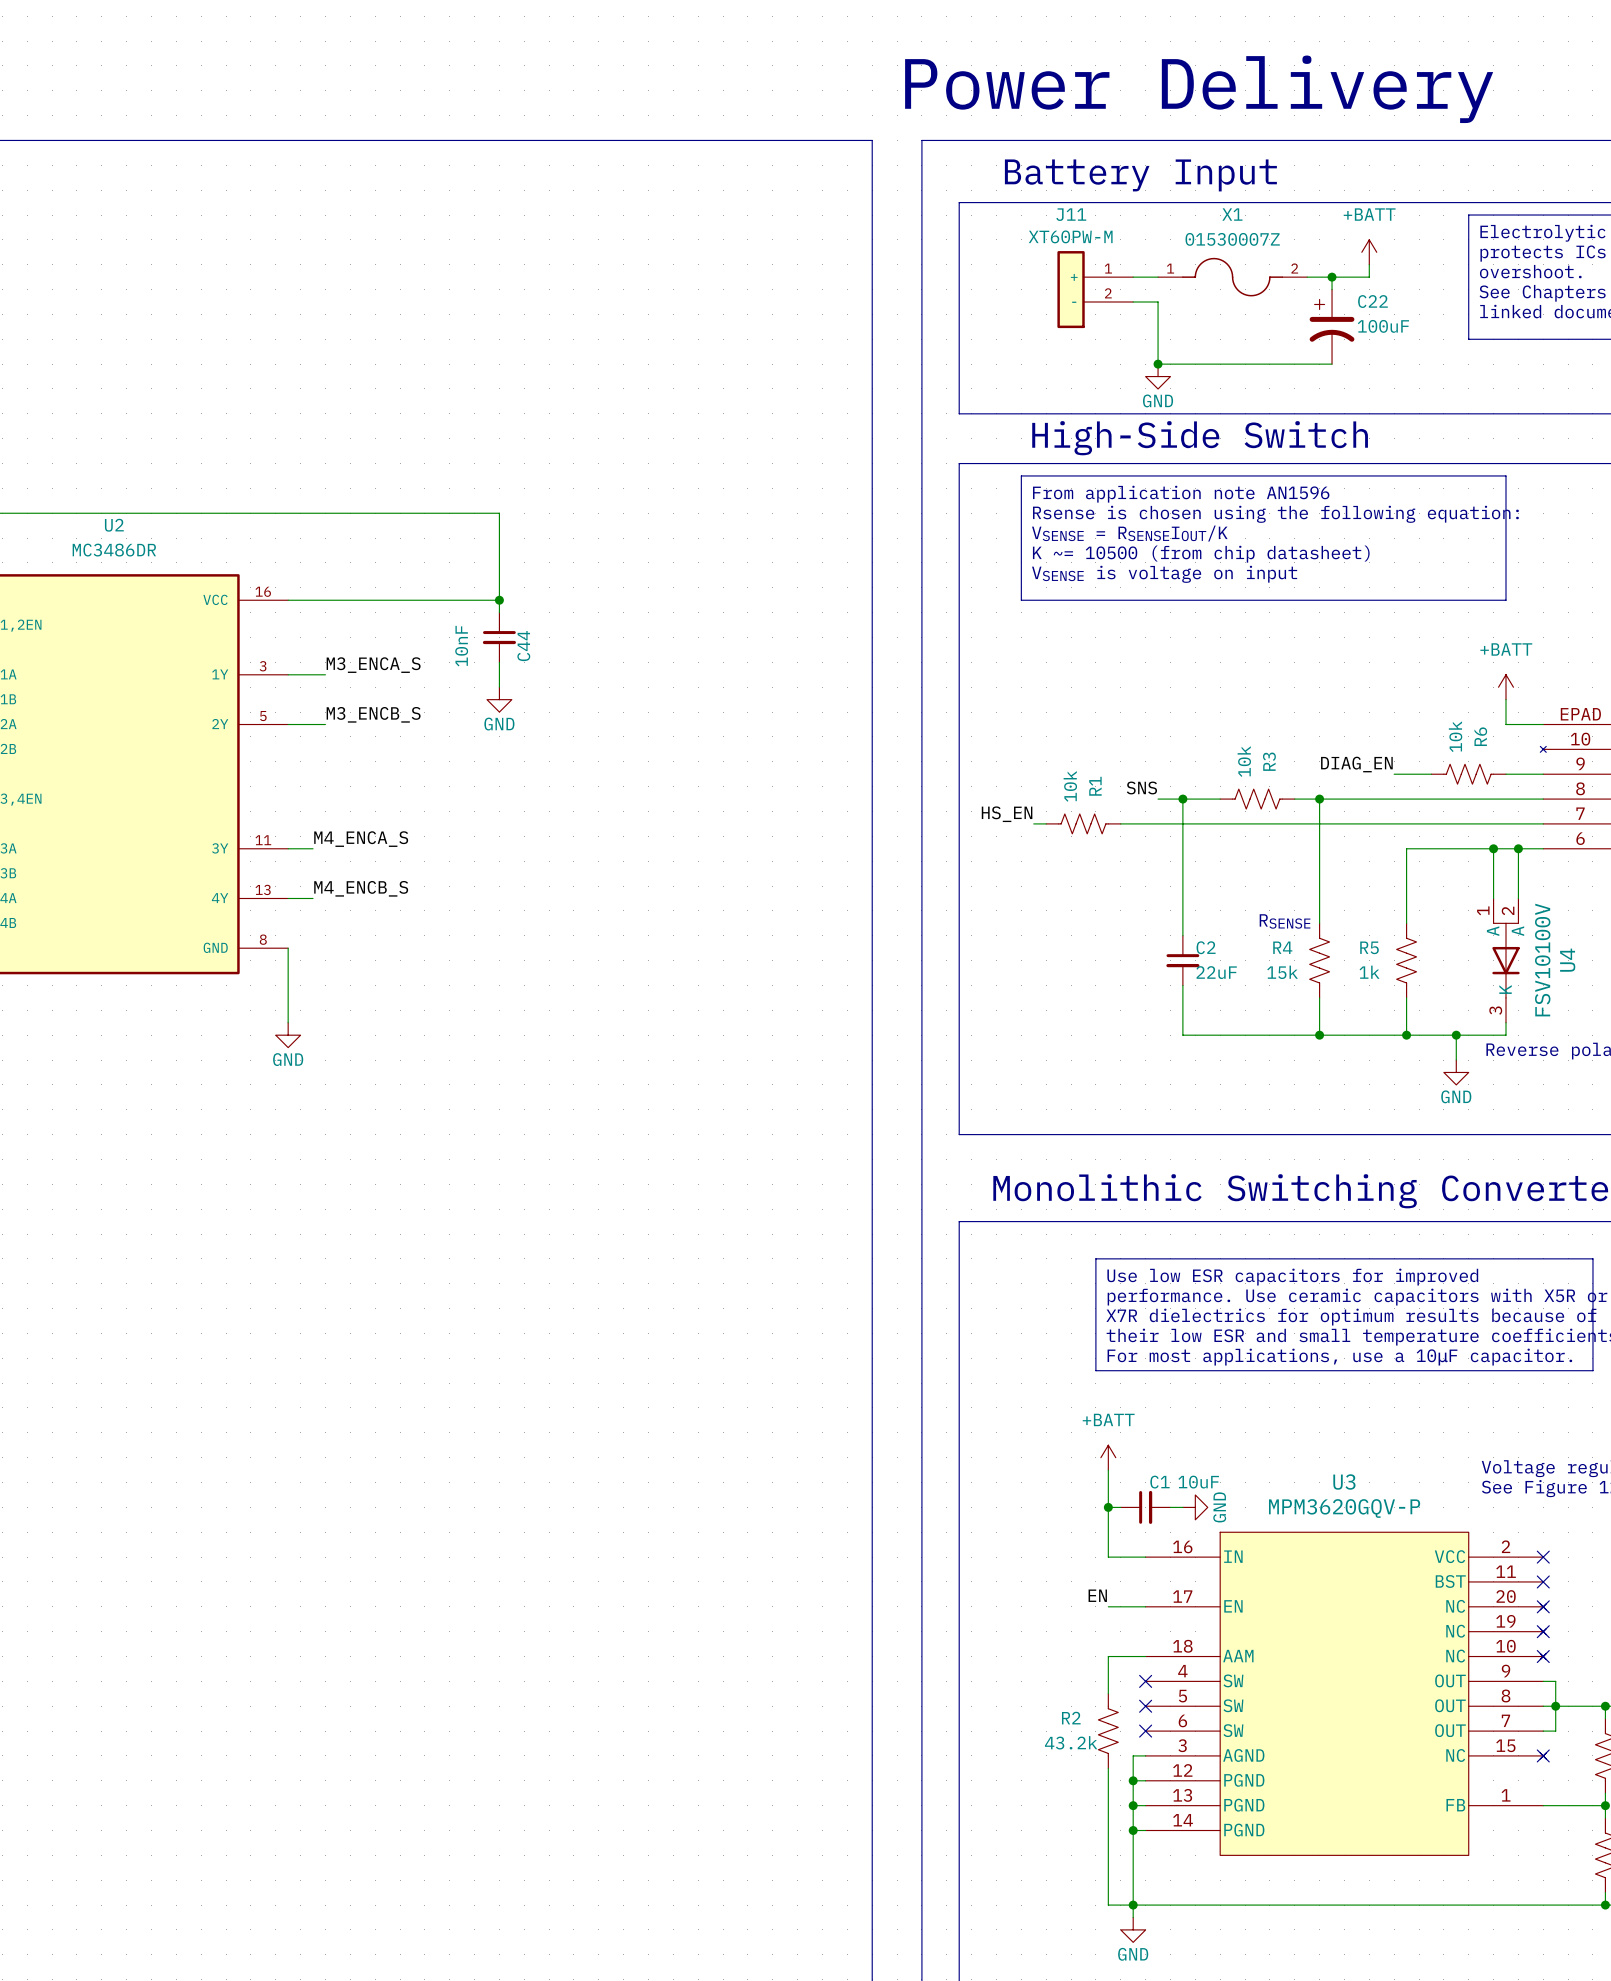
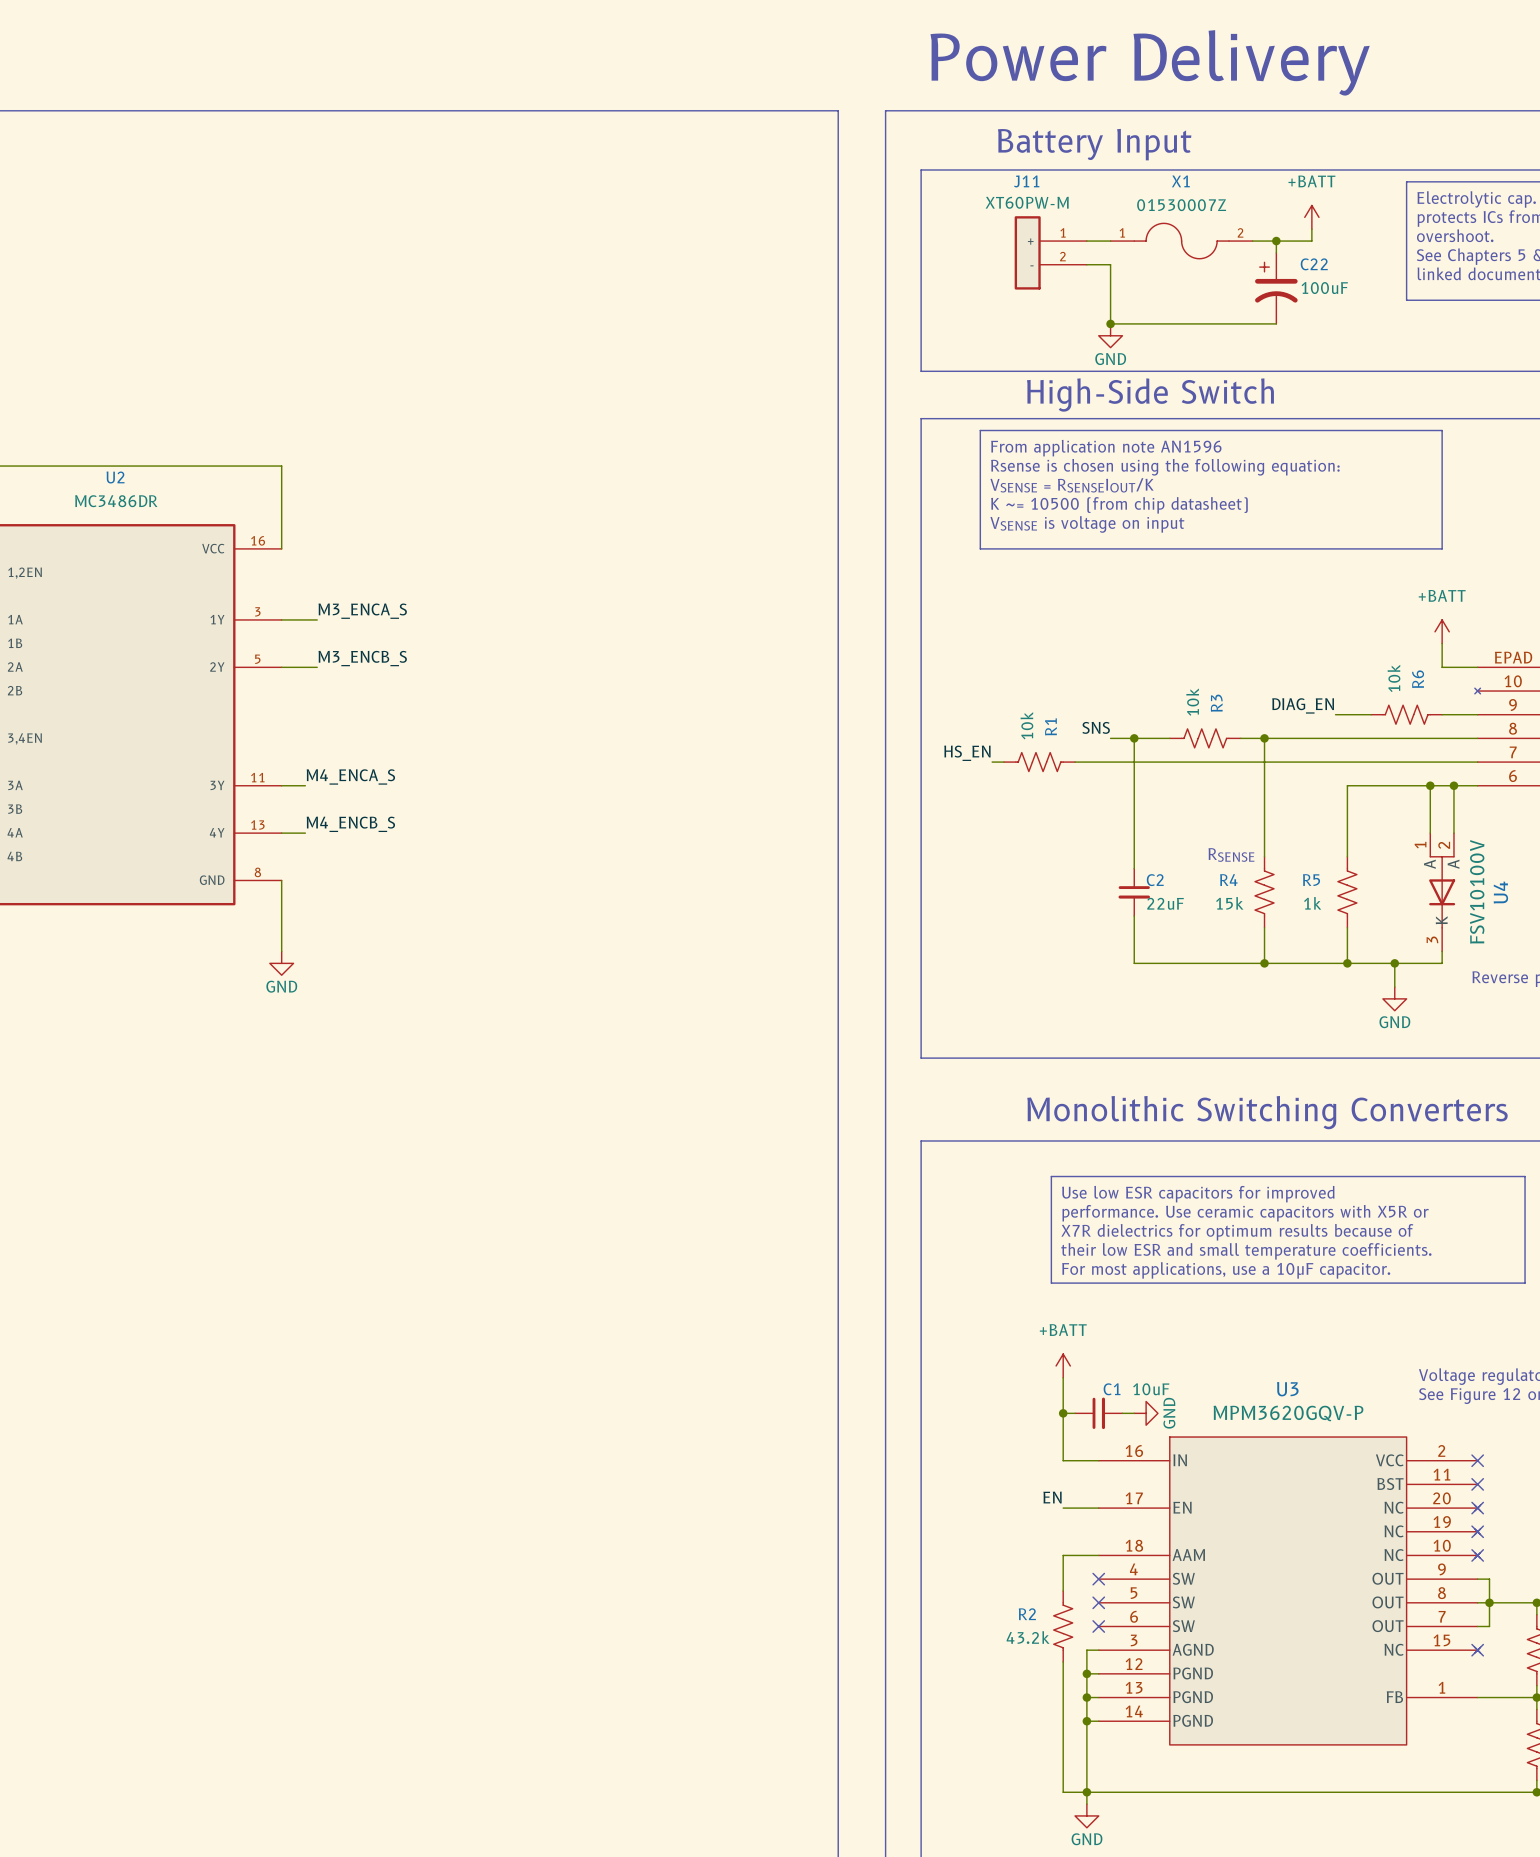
wire: (288, 513) (499, 513) (499, 612) -> (281, 466) (281, 548)
wire: (288, 600) (499, 600) -> none
junction: (499, 600) -> none
C44: 10nF (499, 637) -> none
wire: (499, 662) (499, 687) -> none
power symbol: GND (499, 699) -> none

